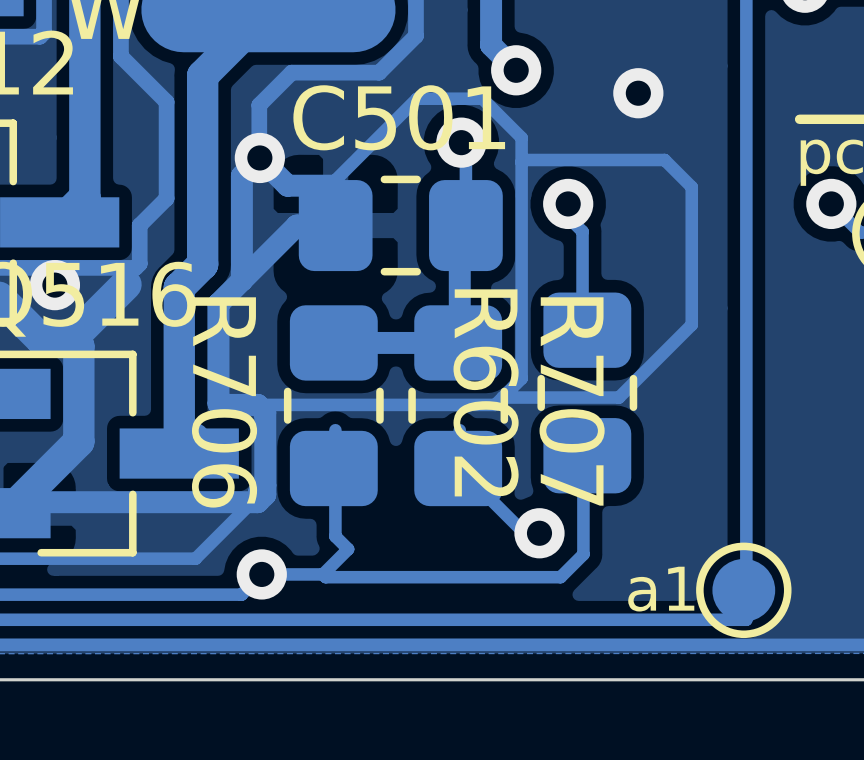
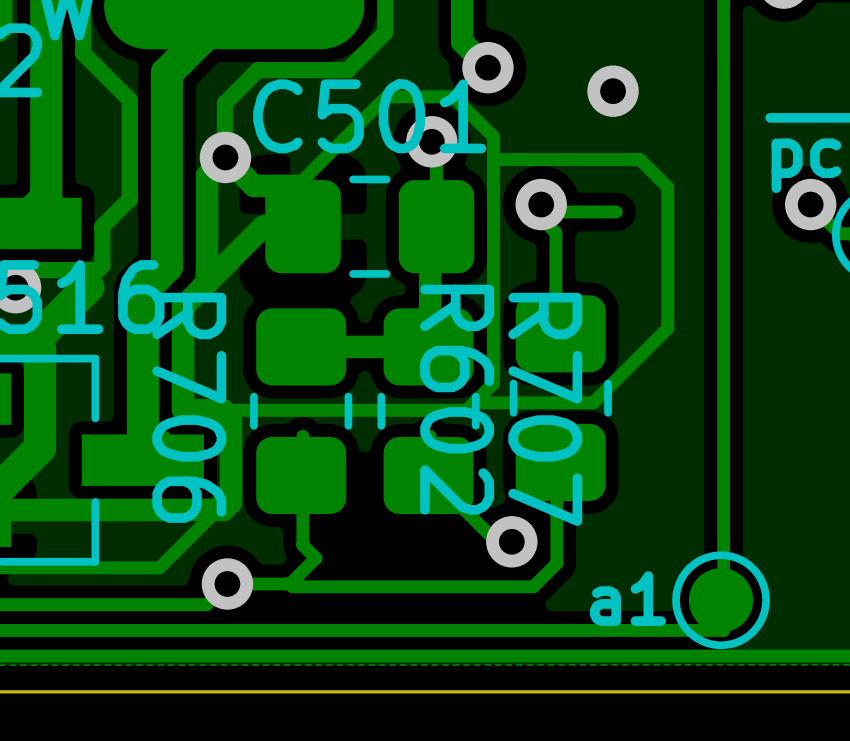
track: none -> (616, 212) (548, 212)

